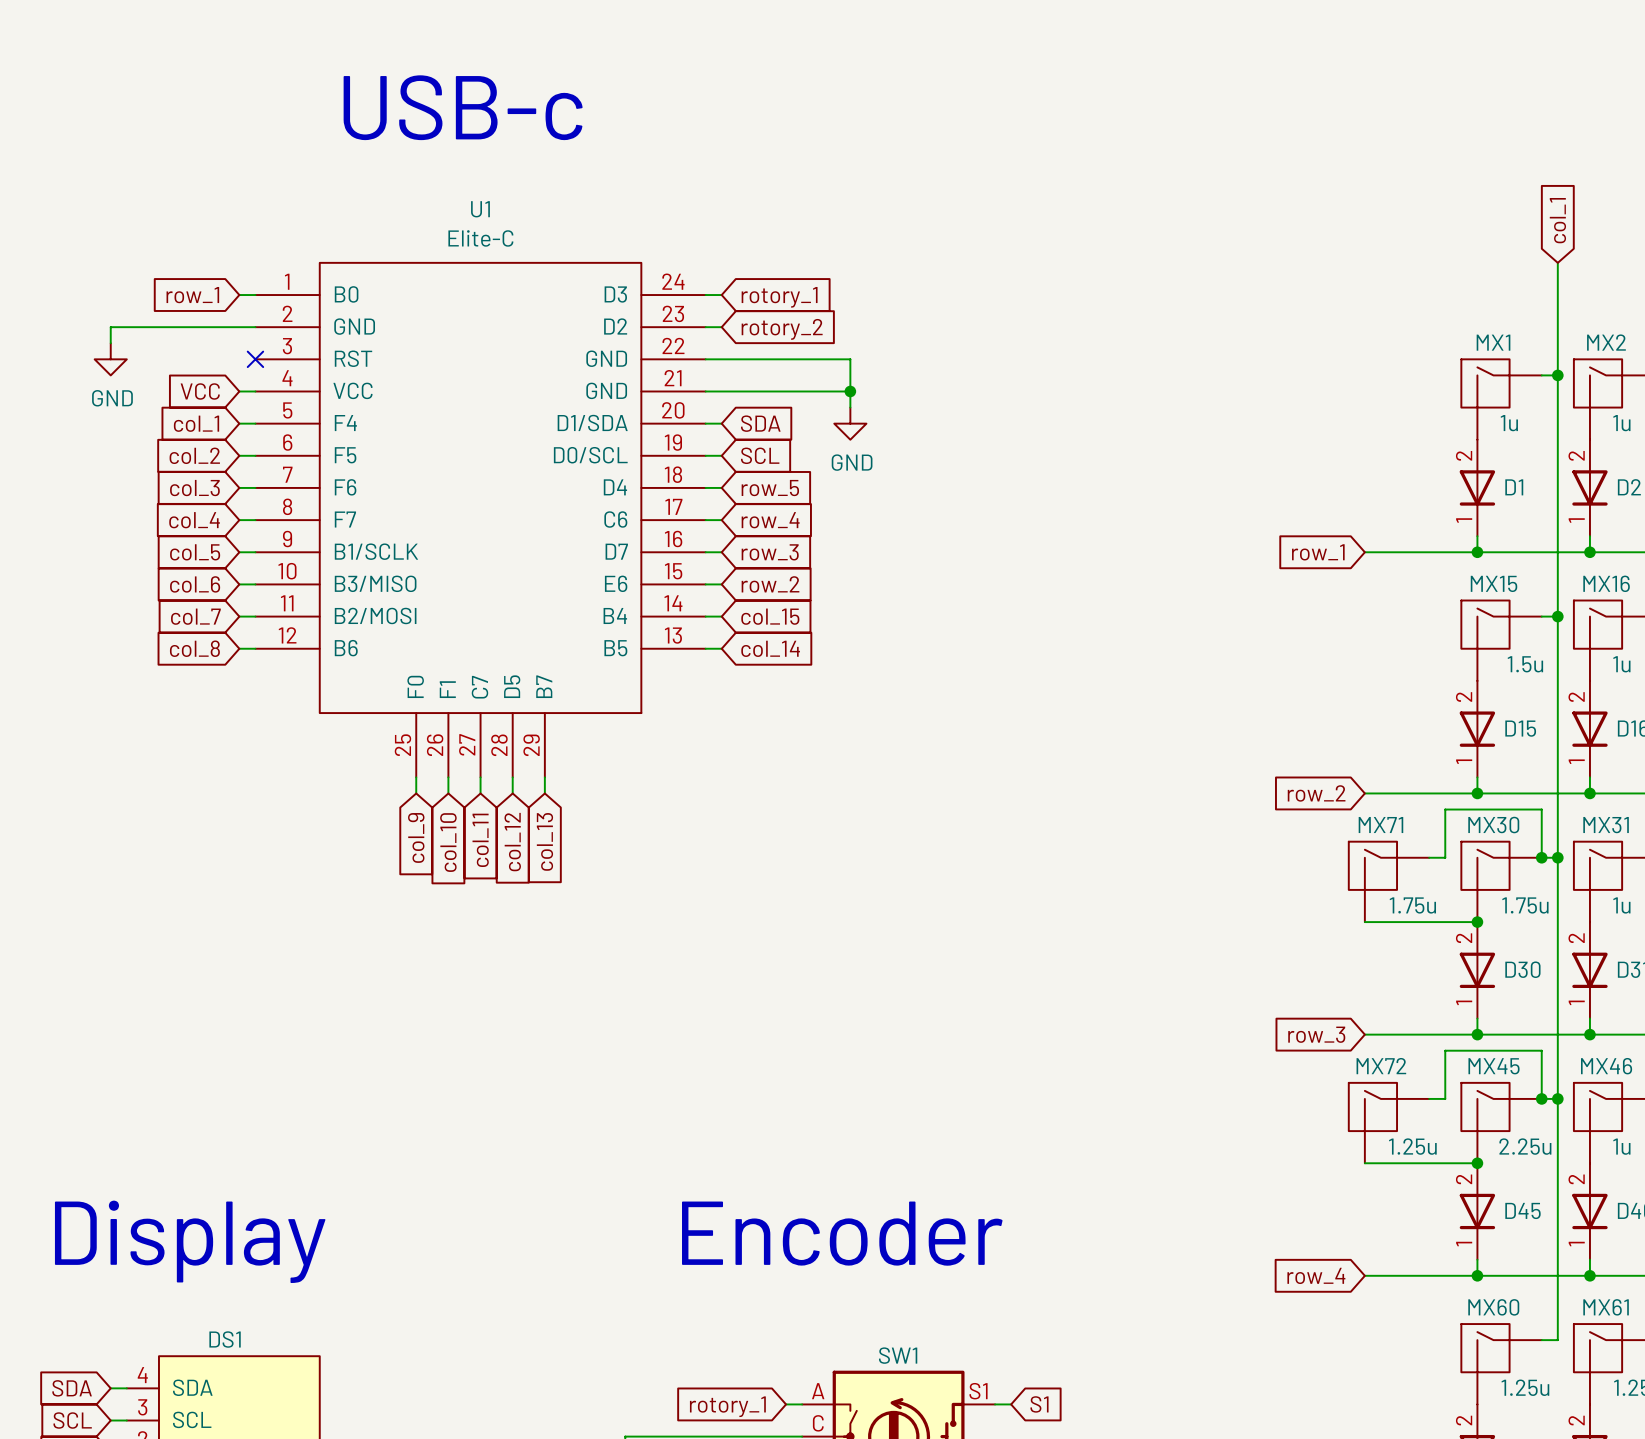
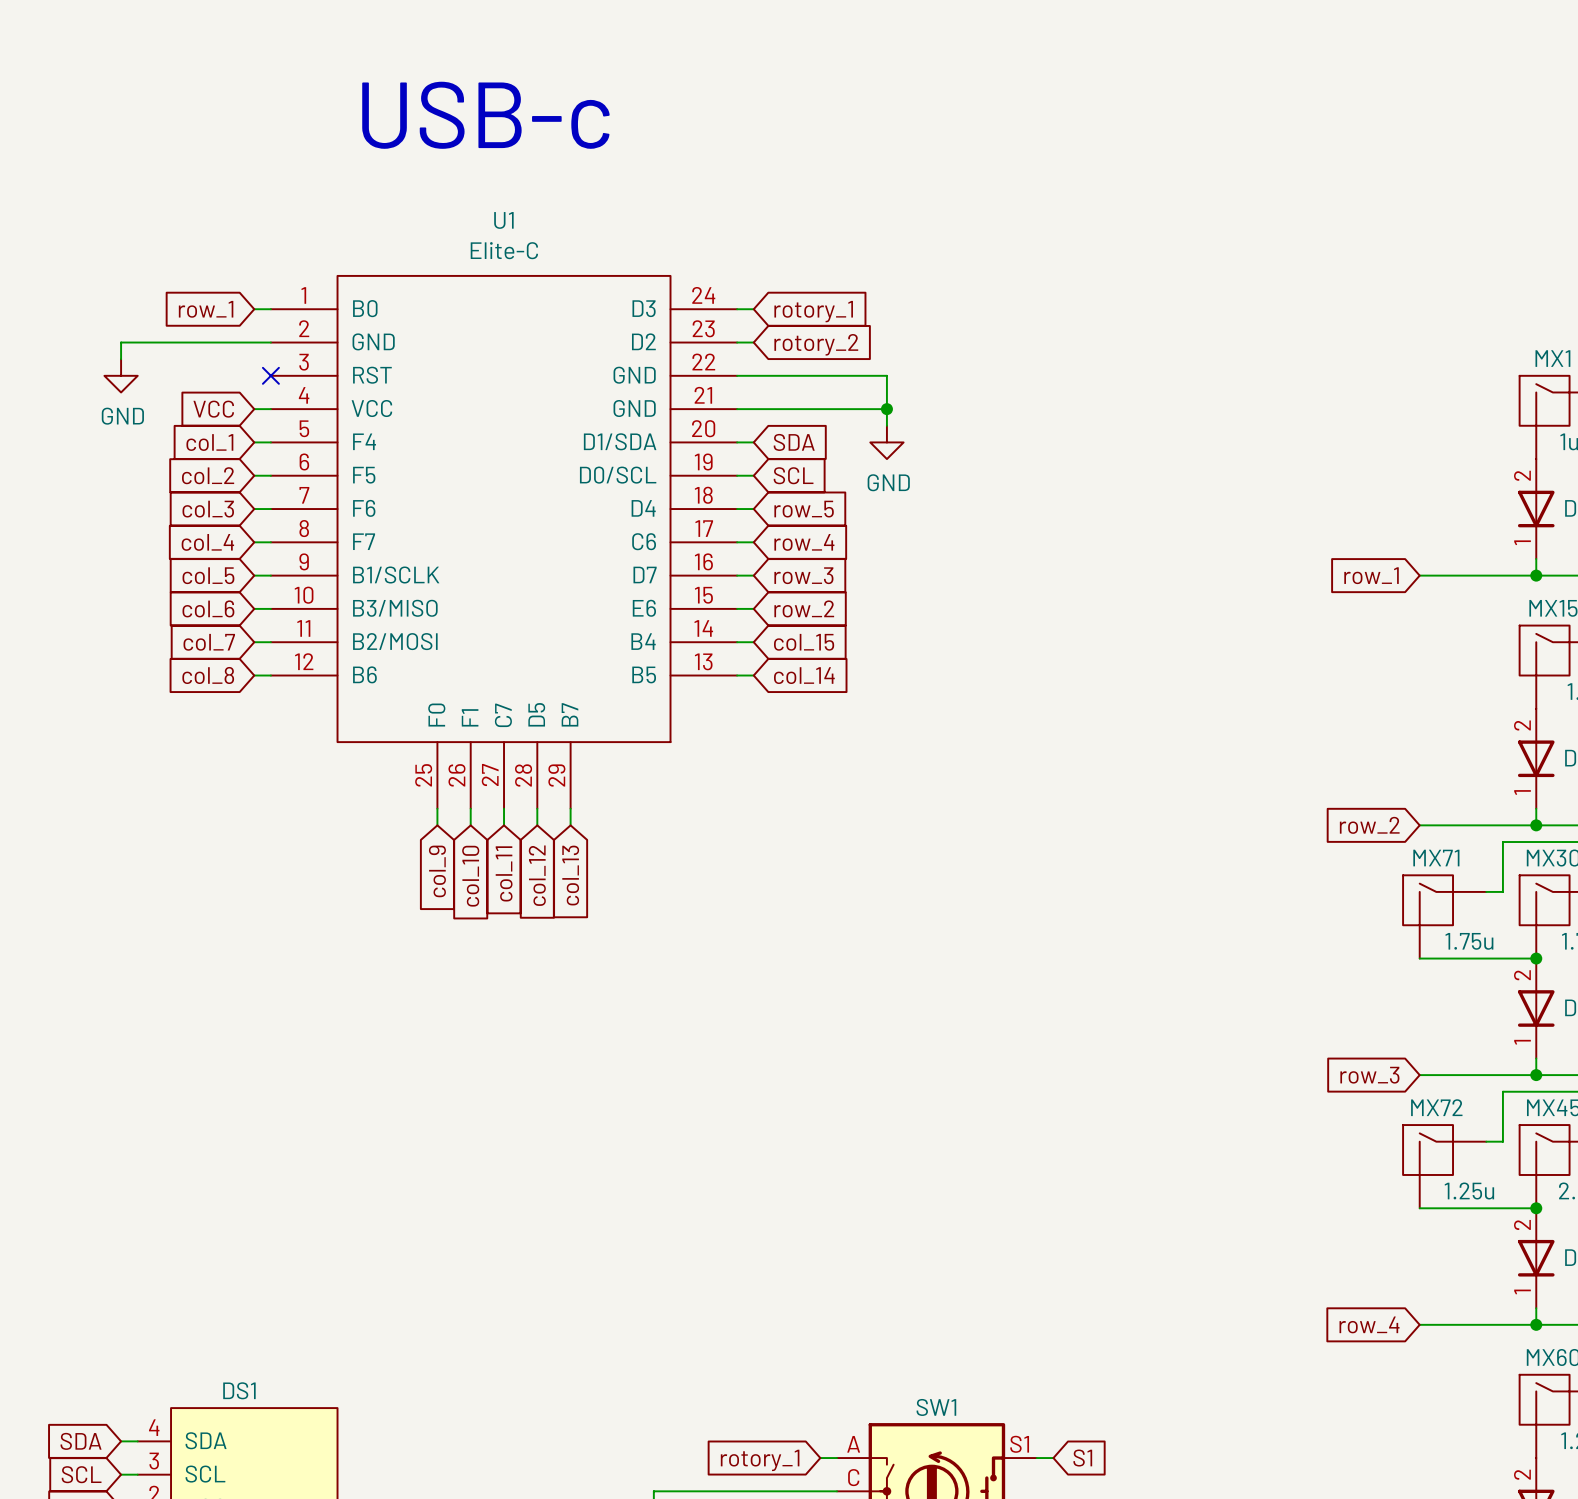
text: Encoder (842, 1233) -> none
text: Display (190, 1241) -> none

